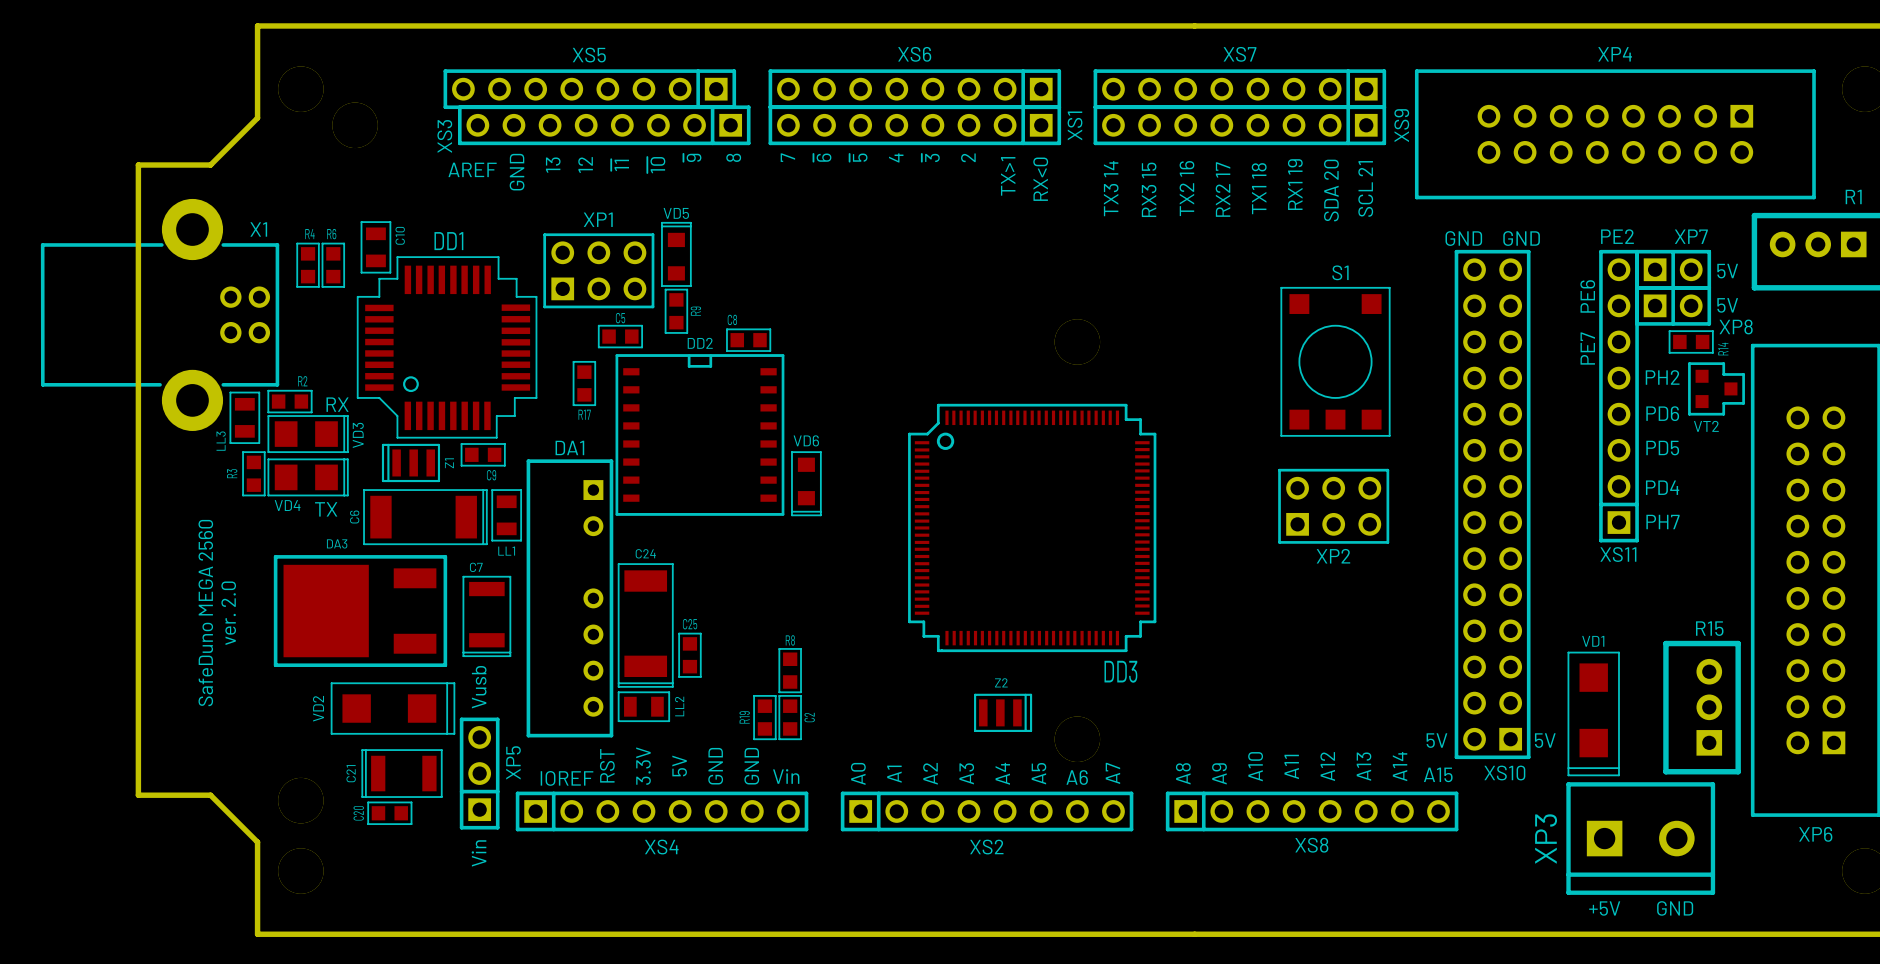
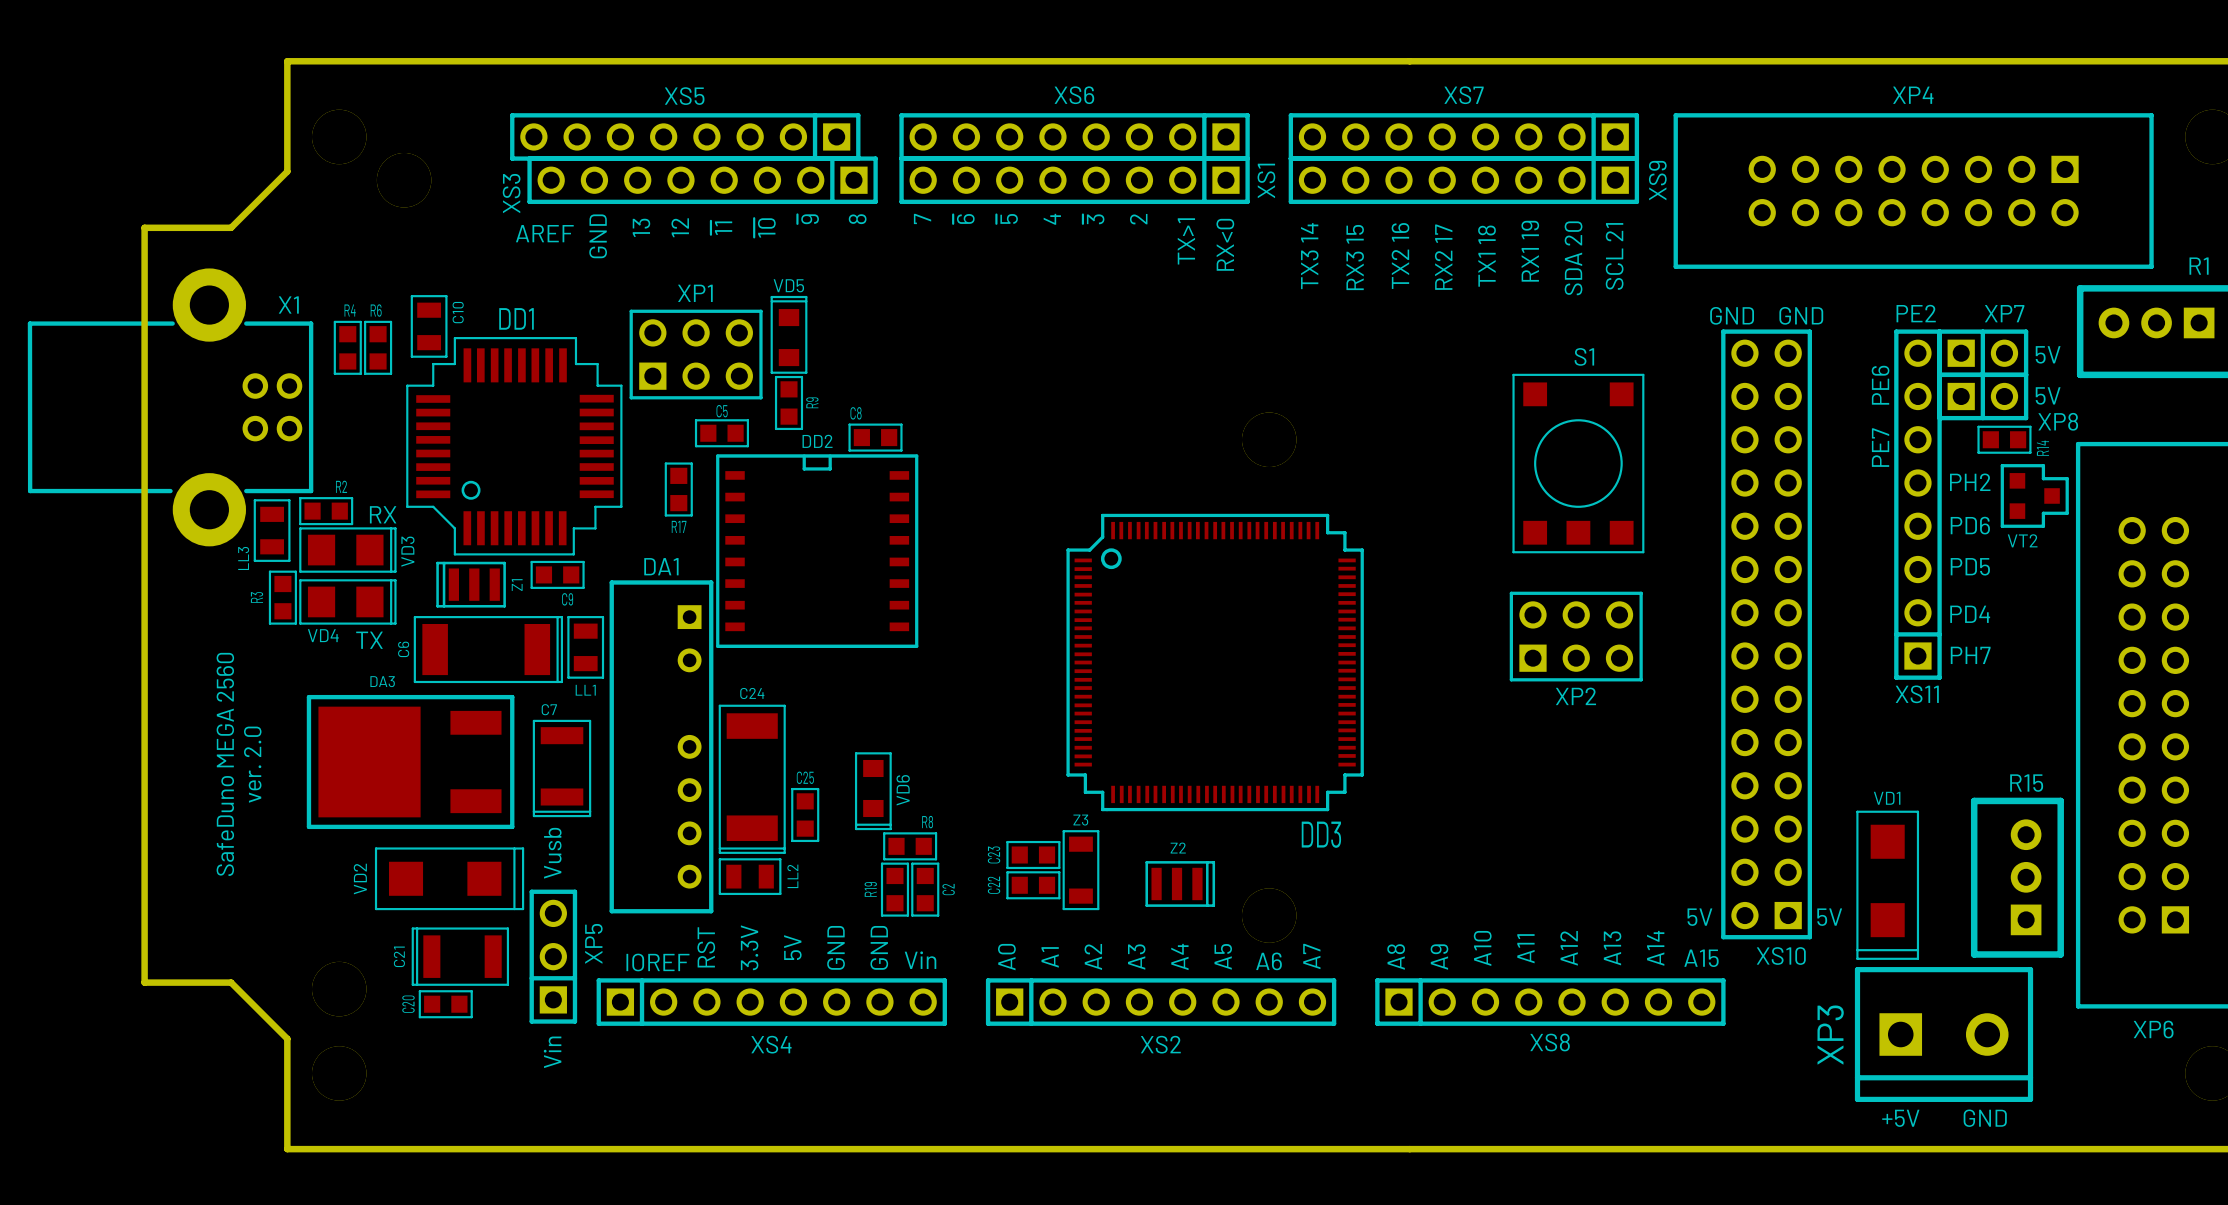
VD6 name rotation: 0° (806, 440) -> 90° counterclockwise (903, 790)
VD6 name position: VD6 (806, 440) -> VD6 (903, 790)
VD6 position: (806, 483) -> (873, 791)
R8 rotation: 0° (790, 670) -> 90° clockwise (910, 846)
C23: none -> (1033, 855)
Z3: none -> (1080, 870)
C22: none -> (1033, 885)

